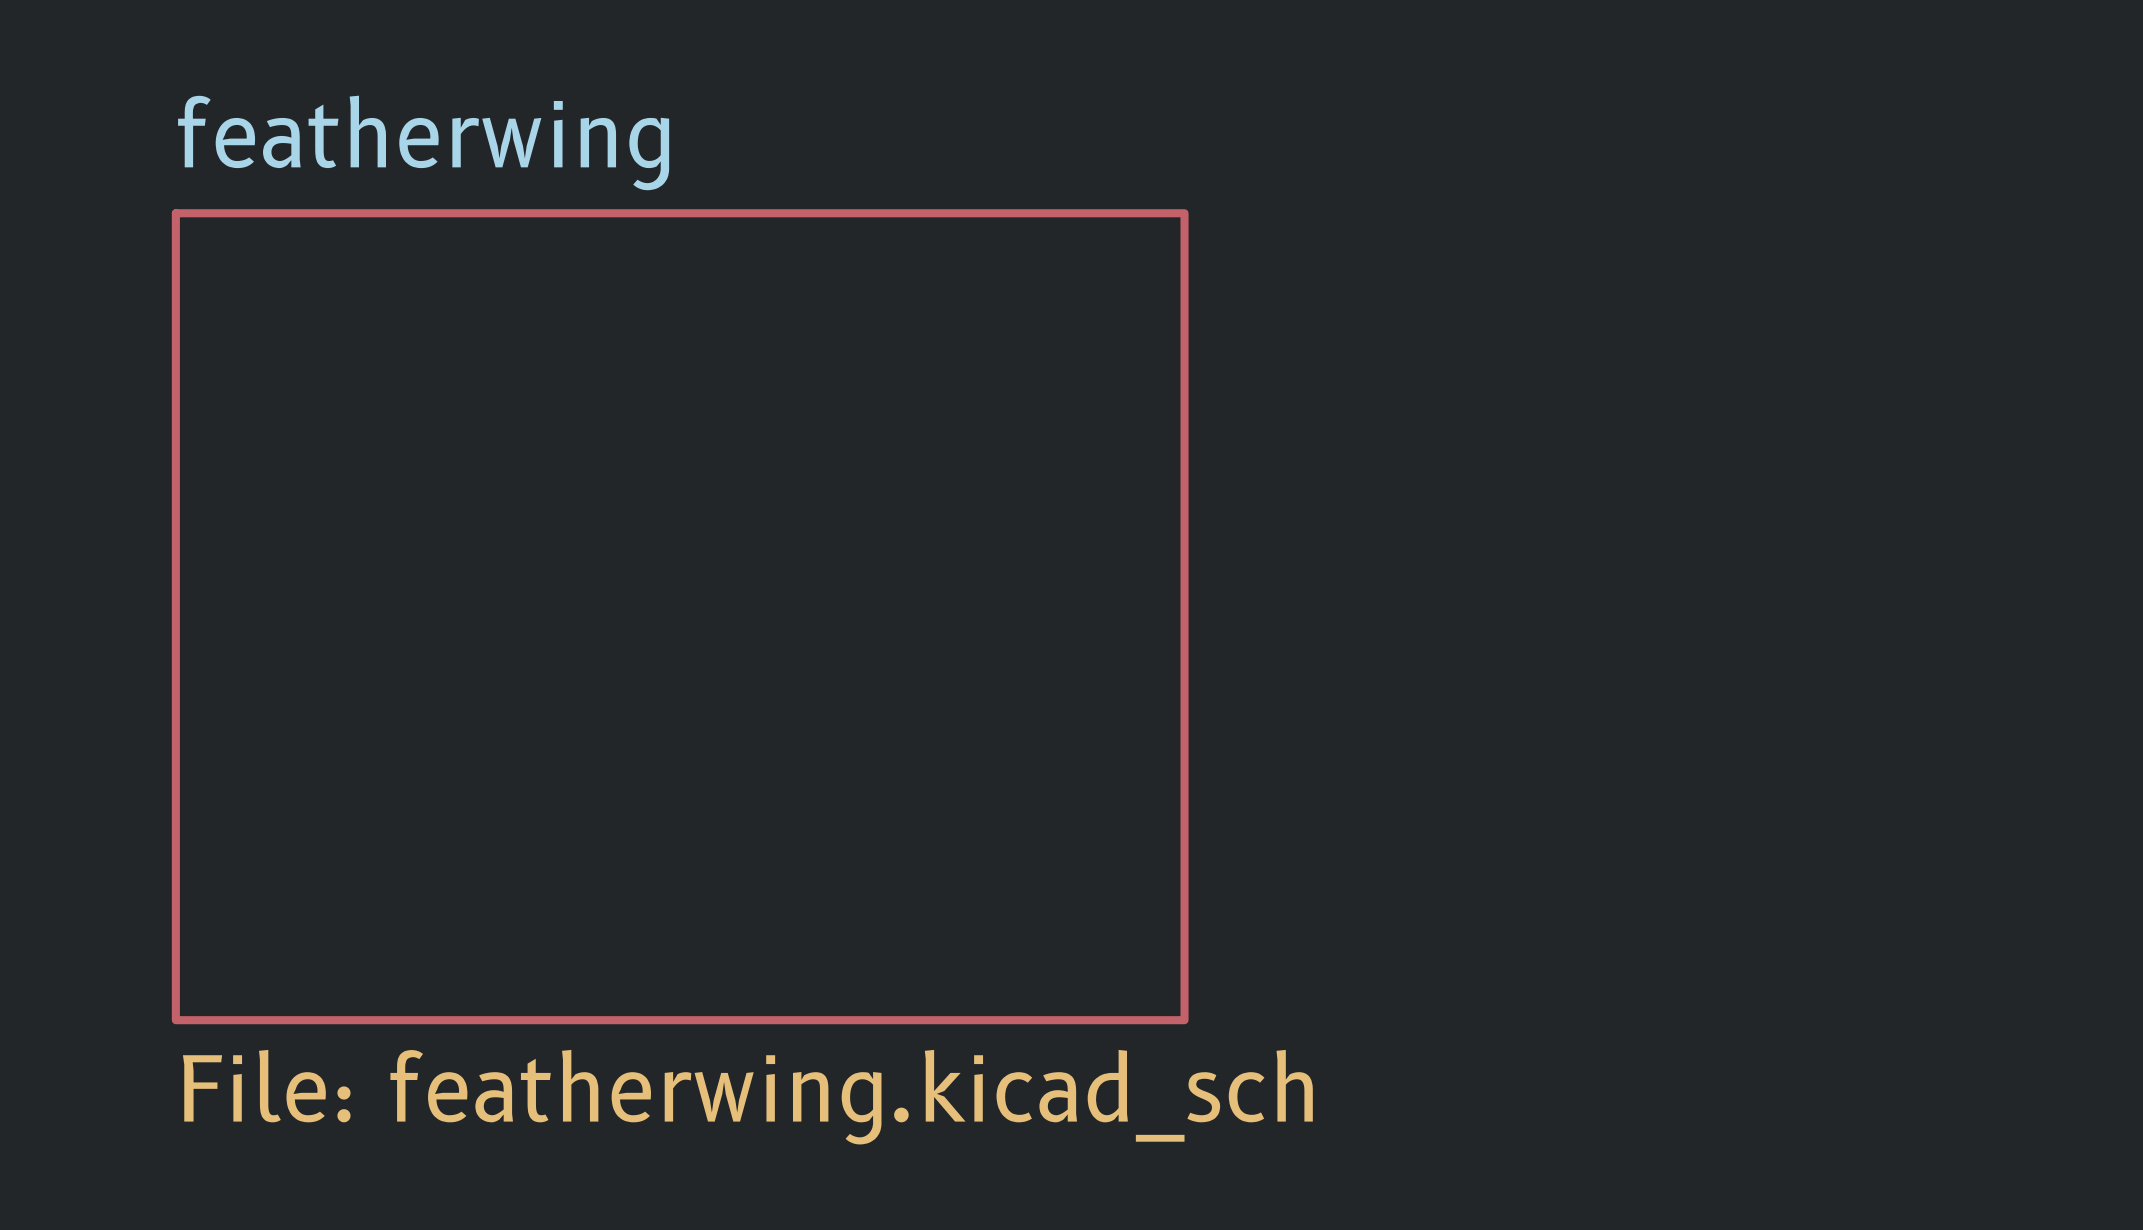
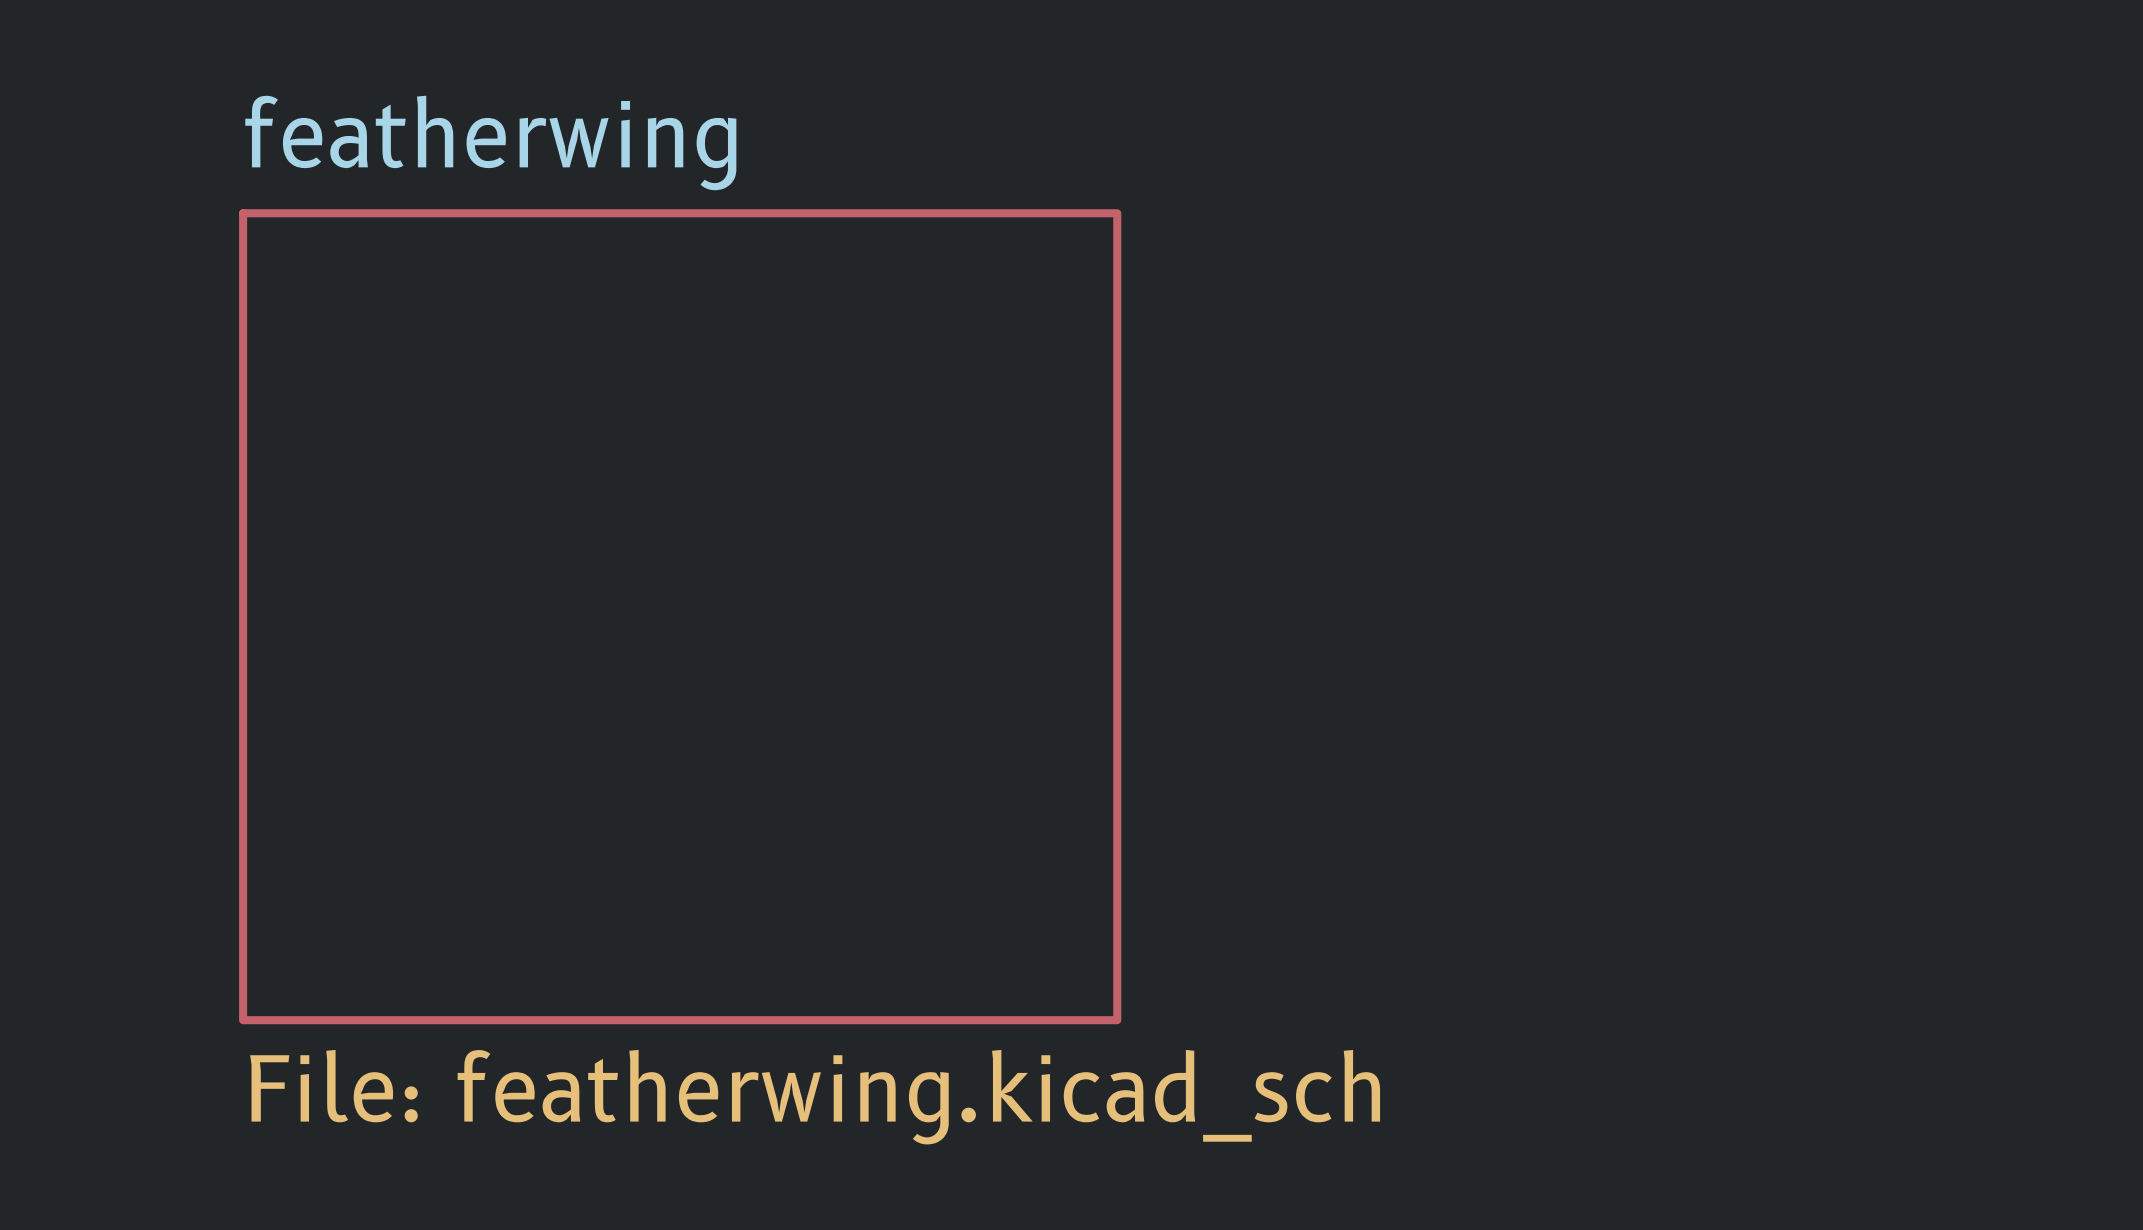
sheet featherwing shape: [171, 209, 1189, 1025] -> [239, 209, 1122, 1025]

